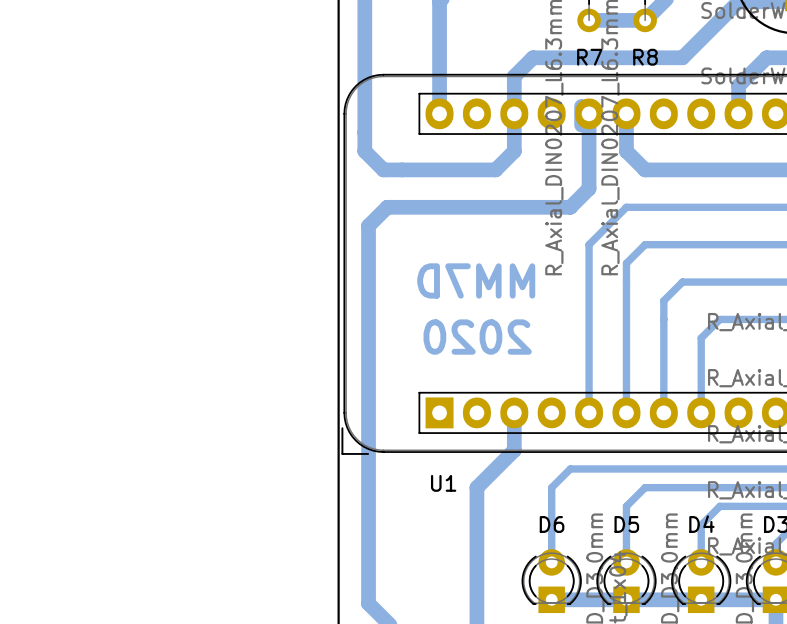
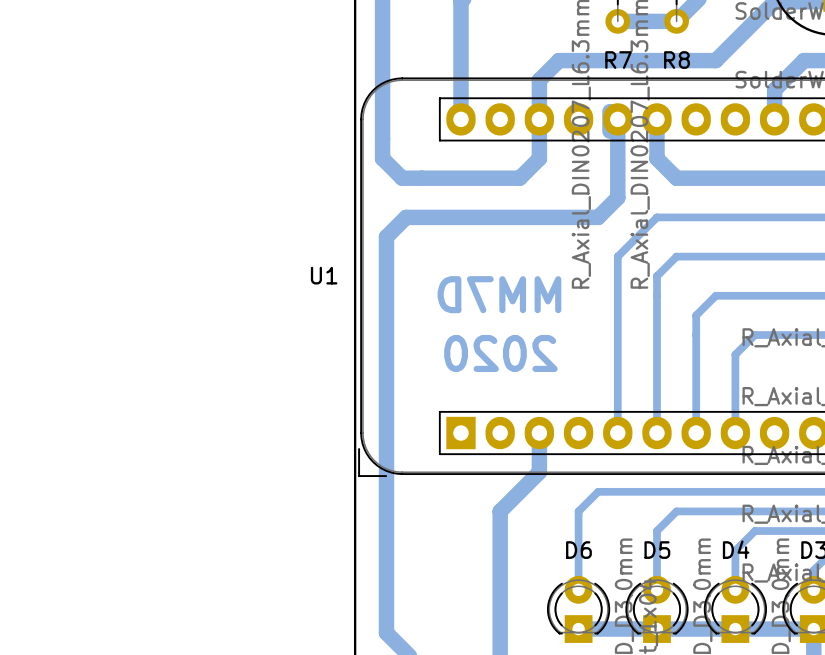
U1 name position: U1 (443, 483) -> U1 (324, 275)

